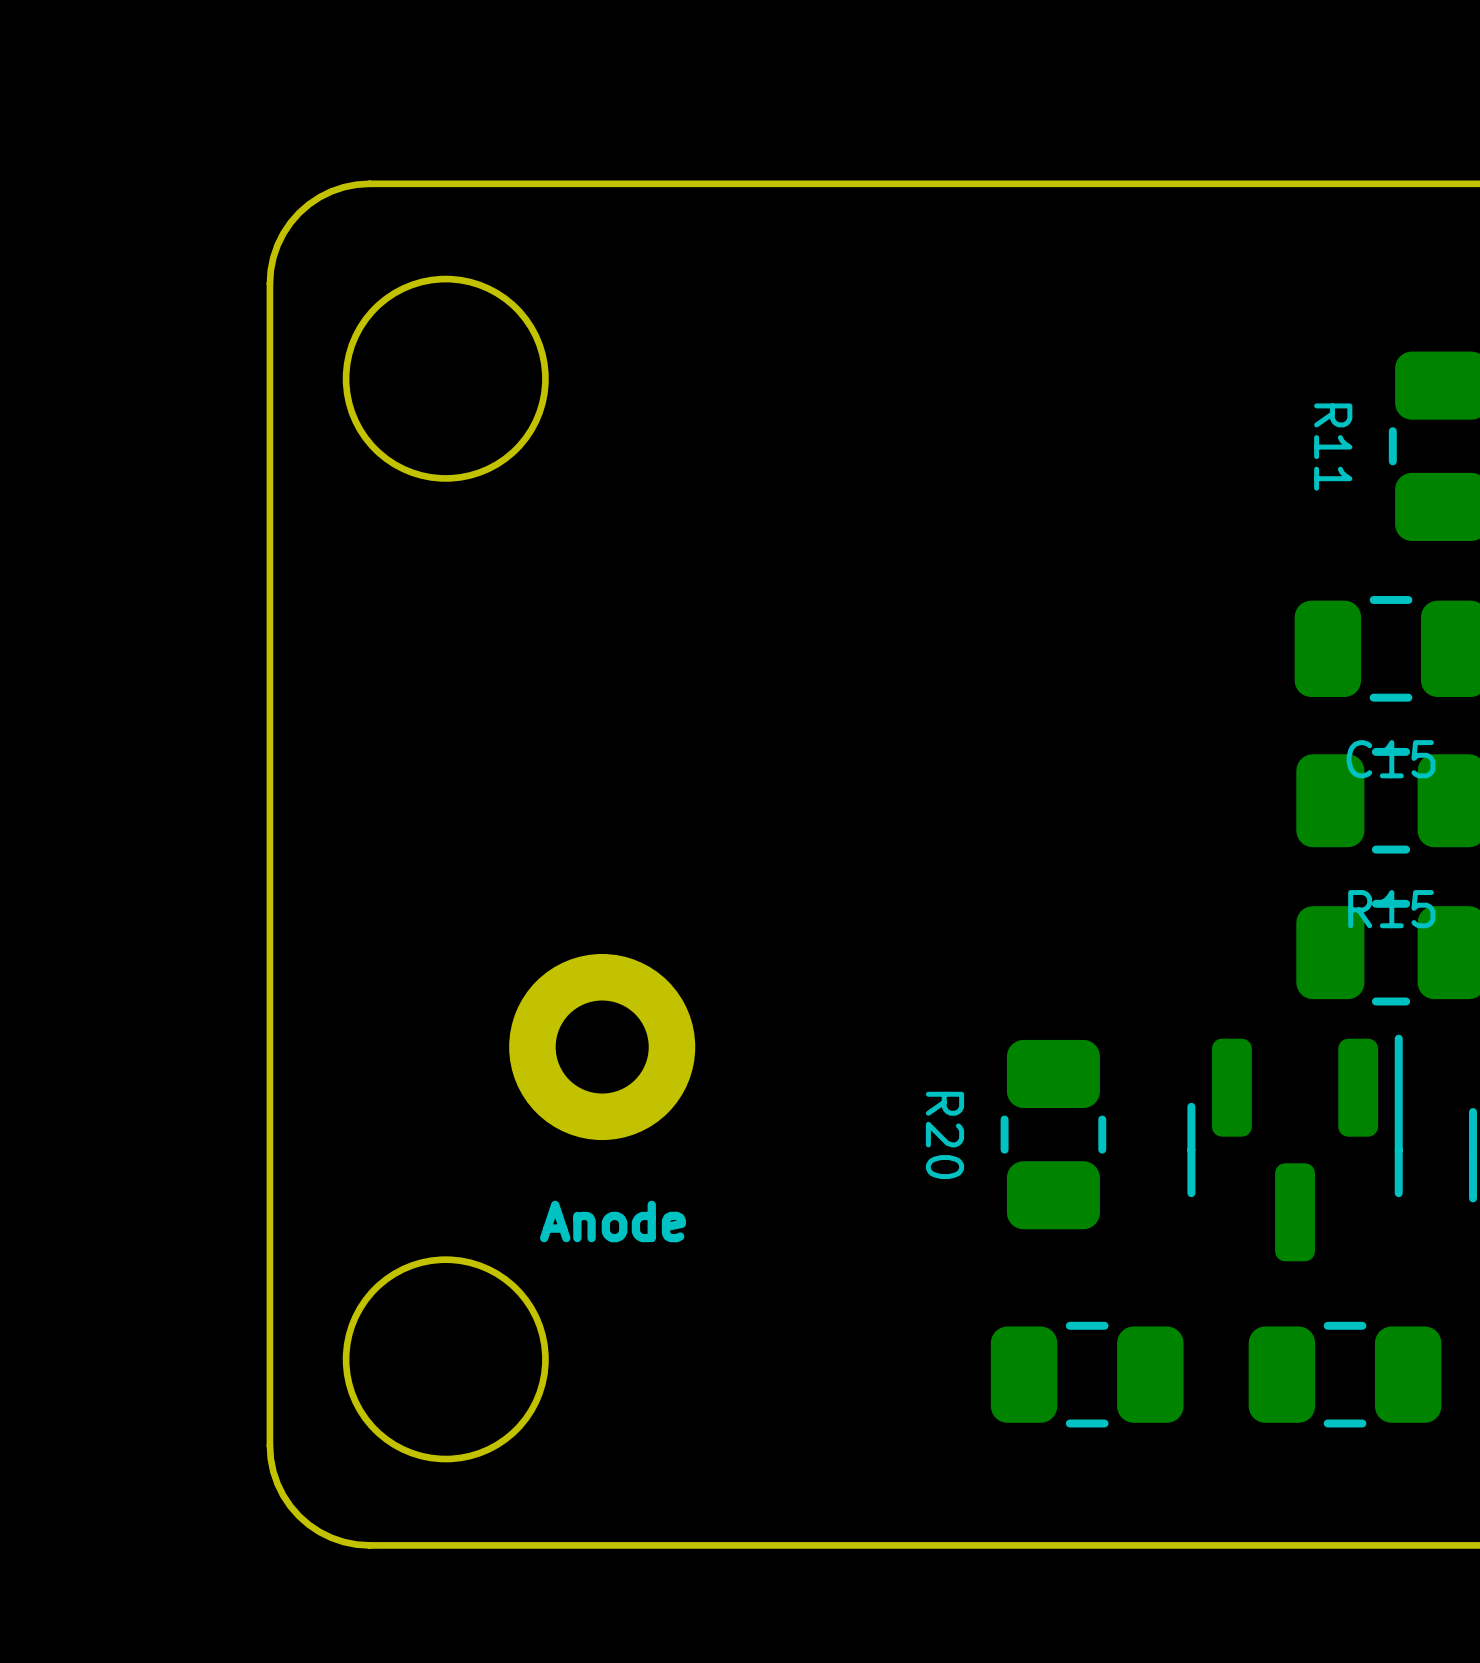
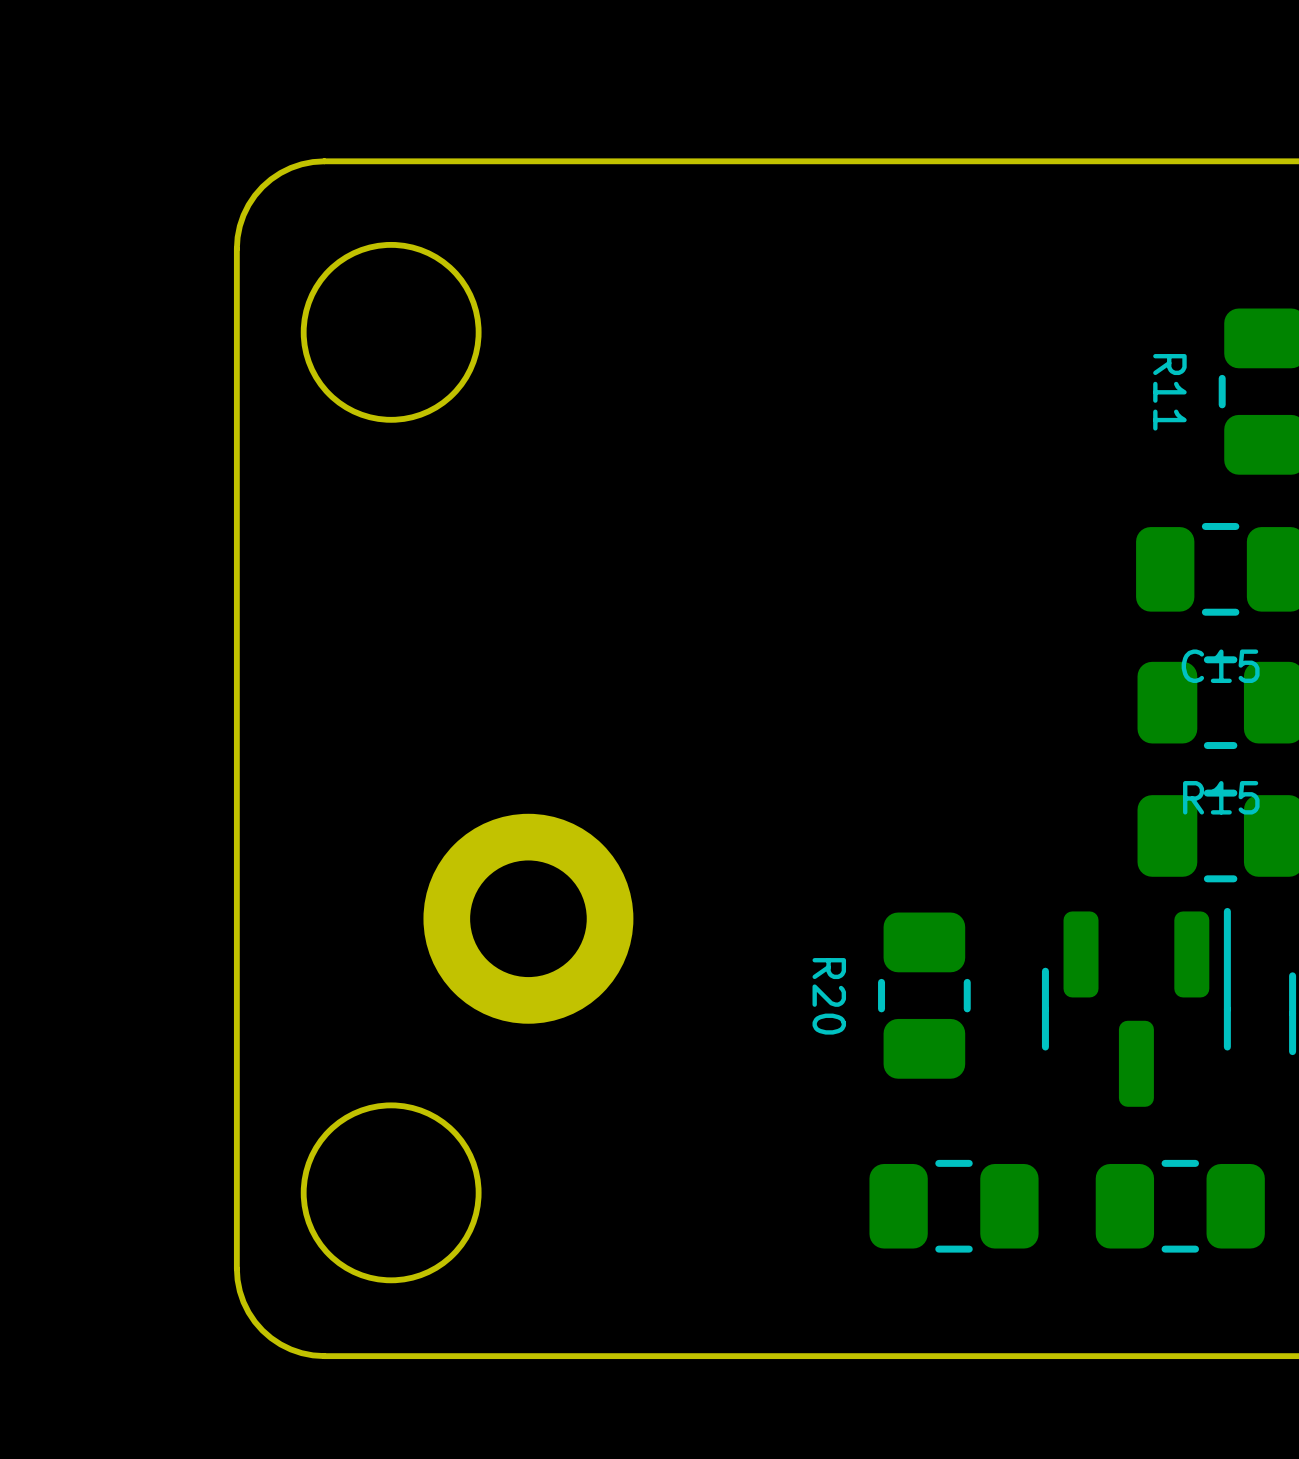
part footprint: [509, 953, 696, 1141] -> [423, 813, 634, 1024]
part value: Anode (612, 1221) -> none

